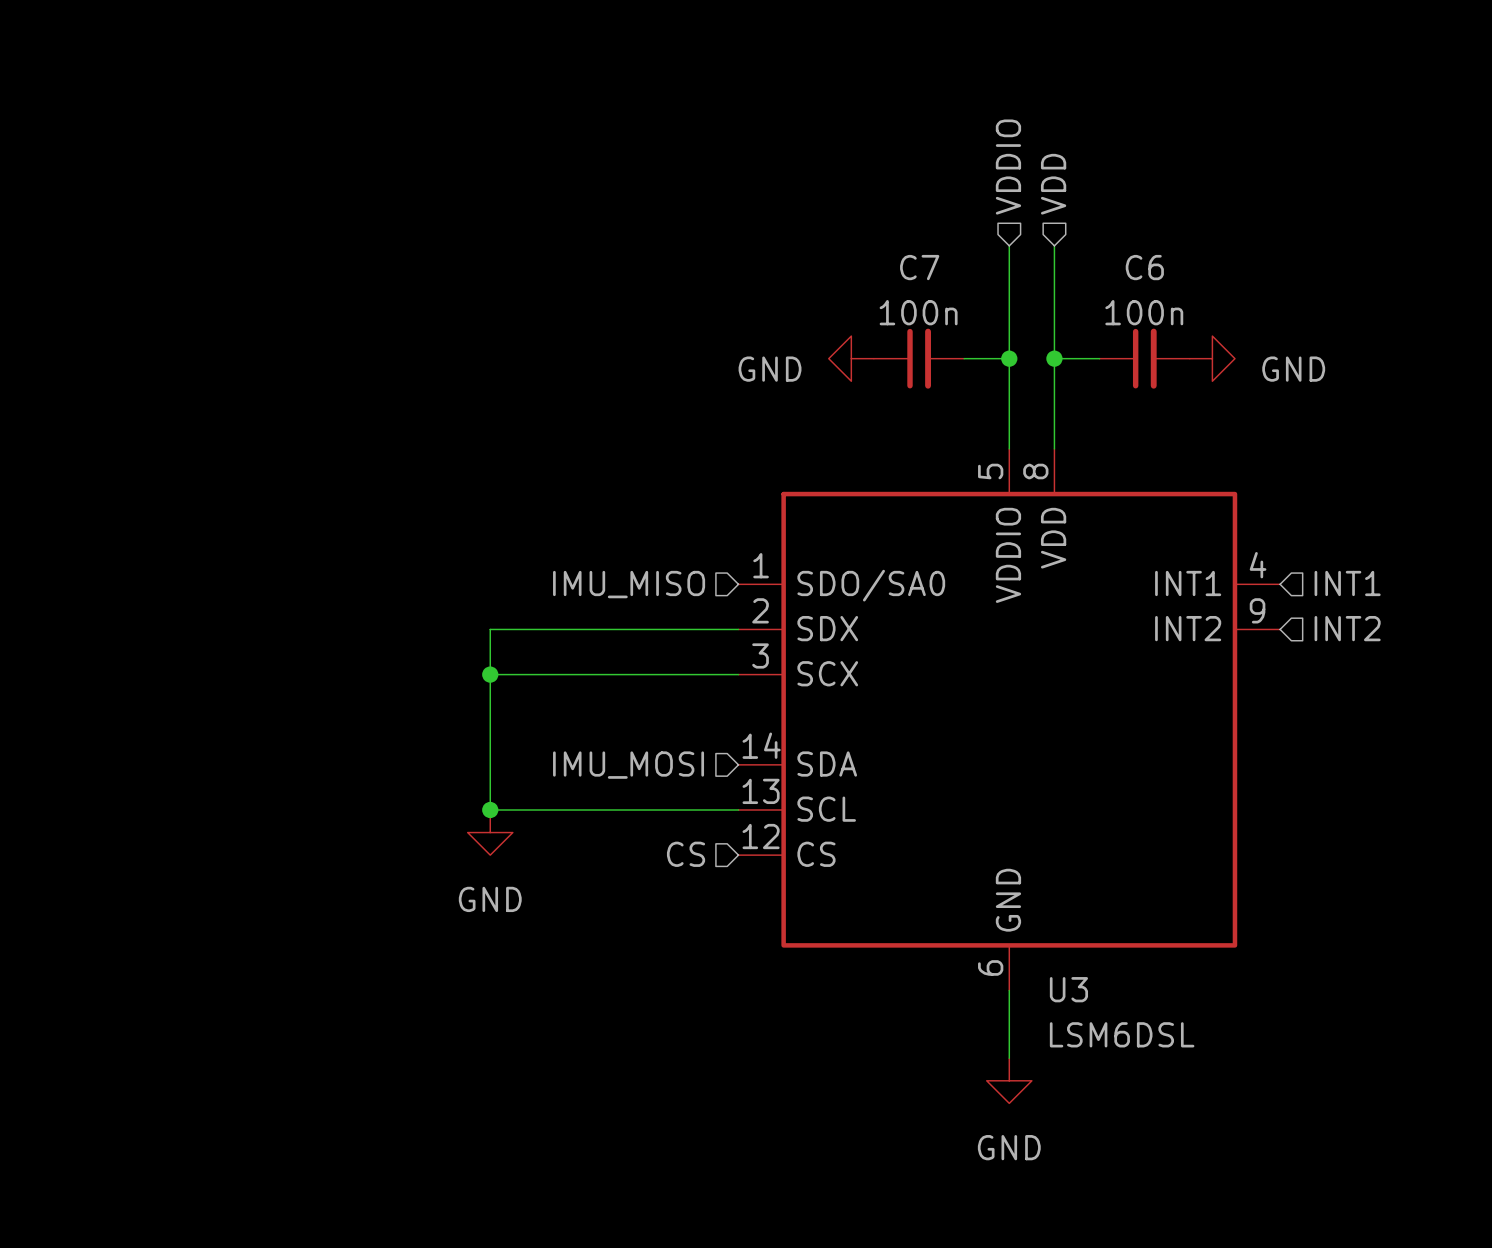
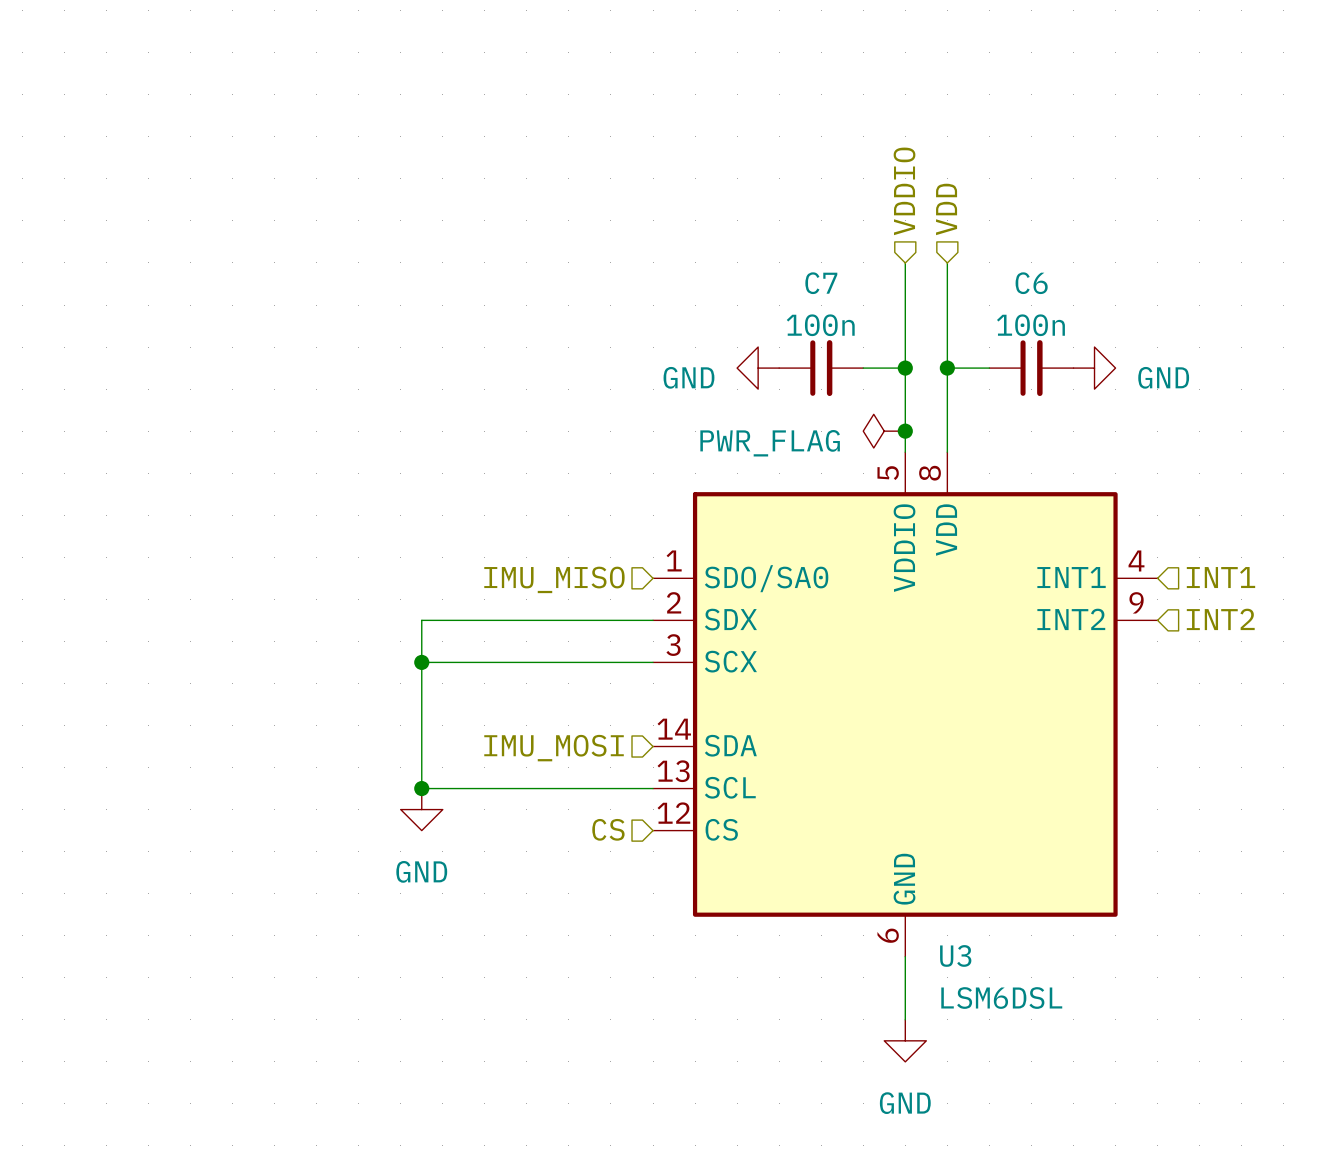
power symbol: none -> PWR_FLAG (884, 431)
junction: none -> (905, 431)

